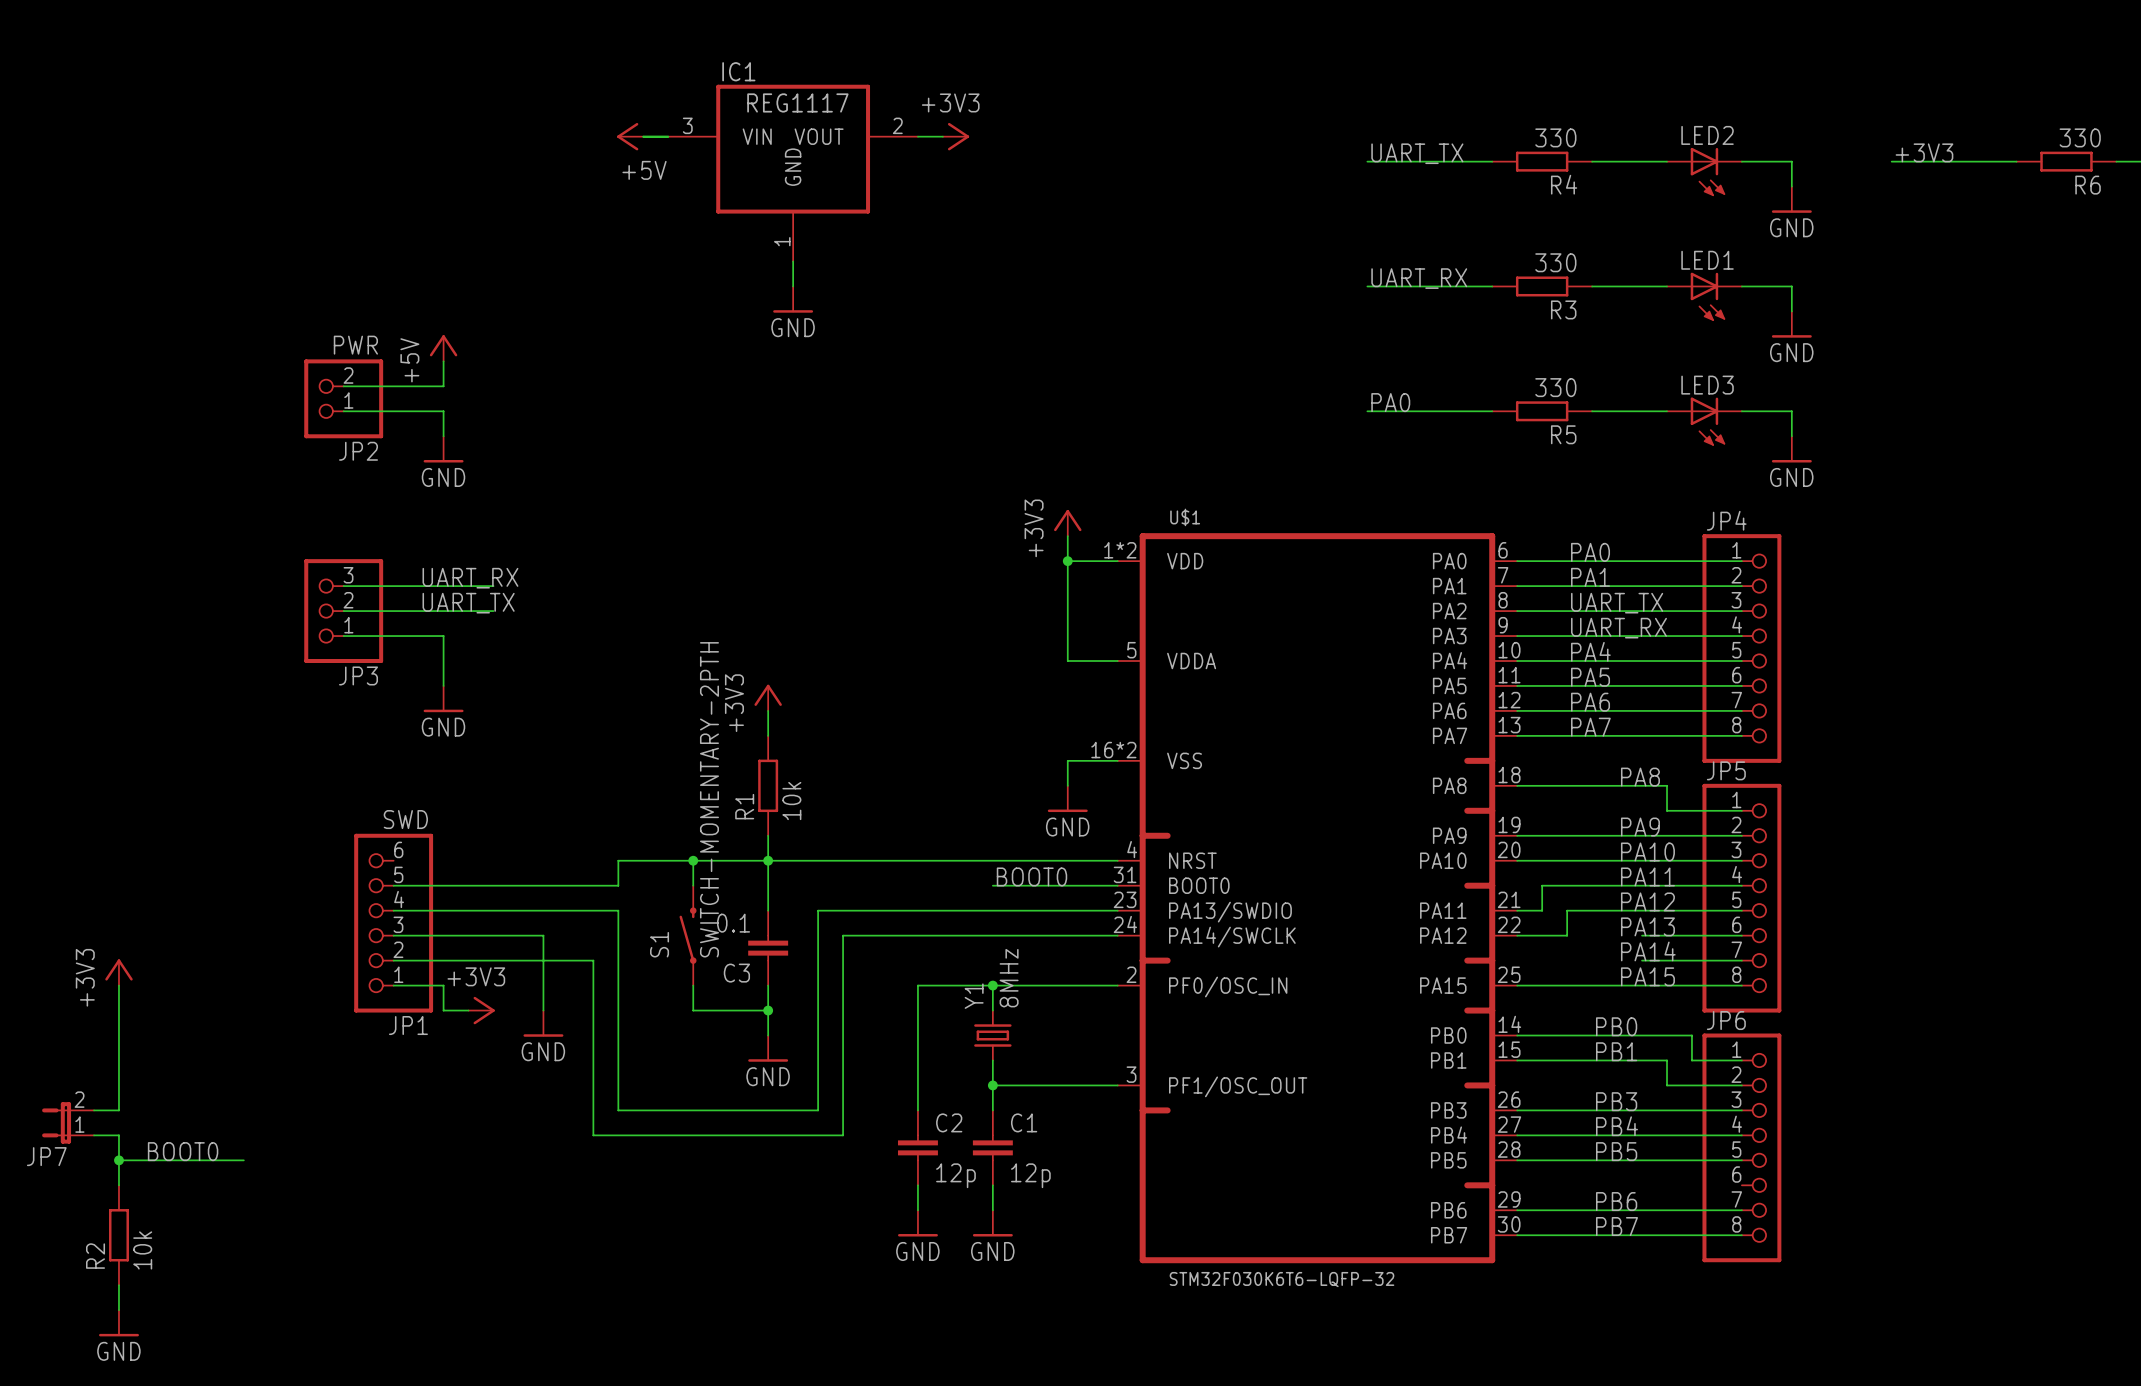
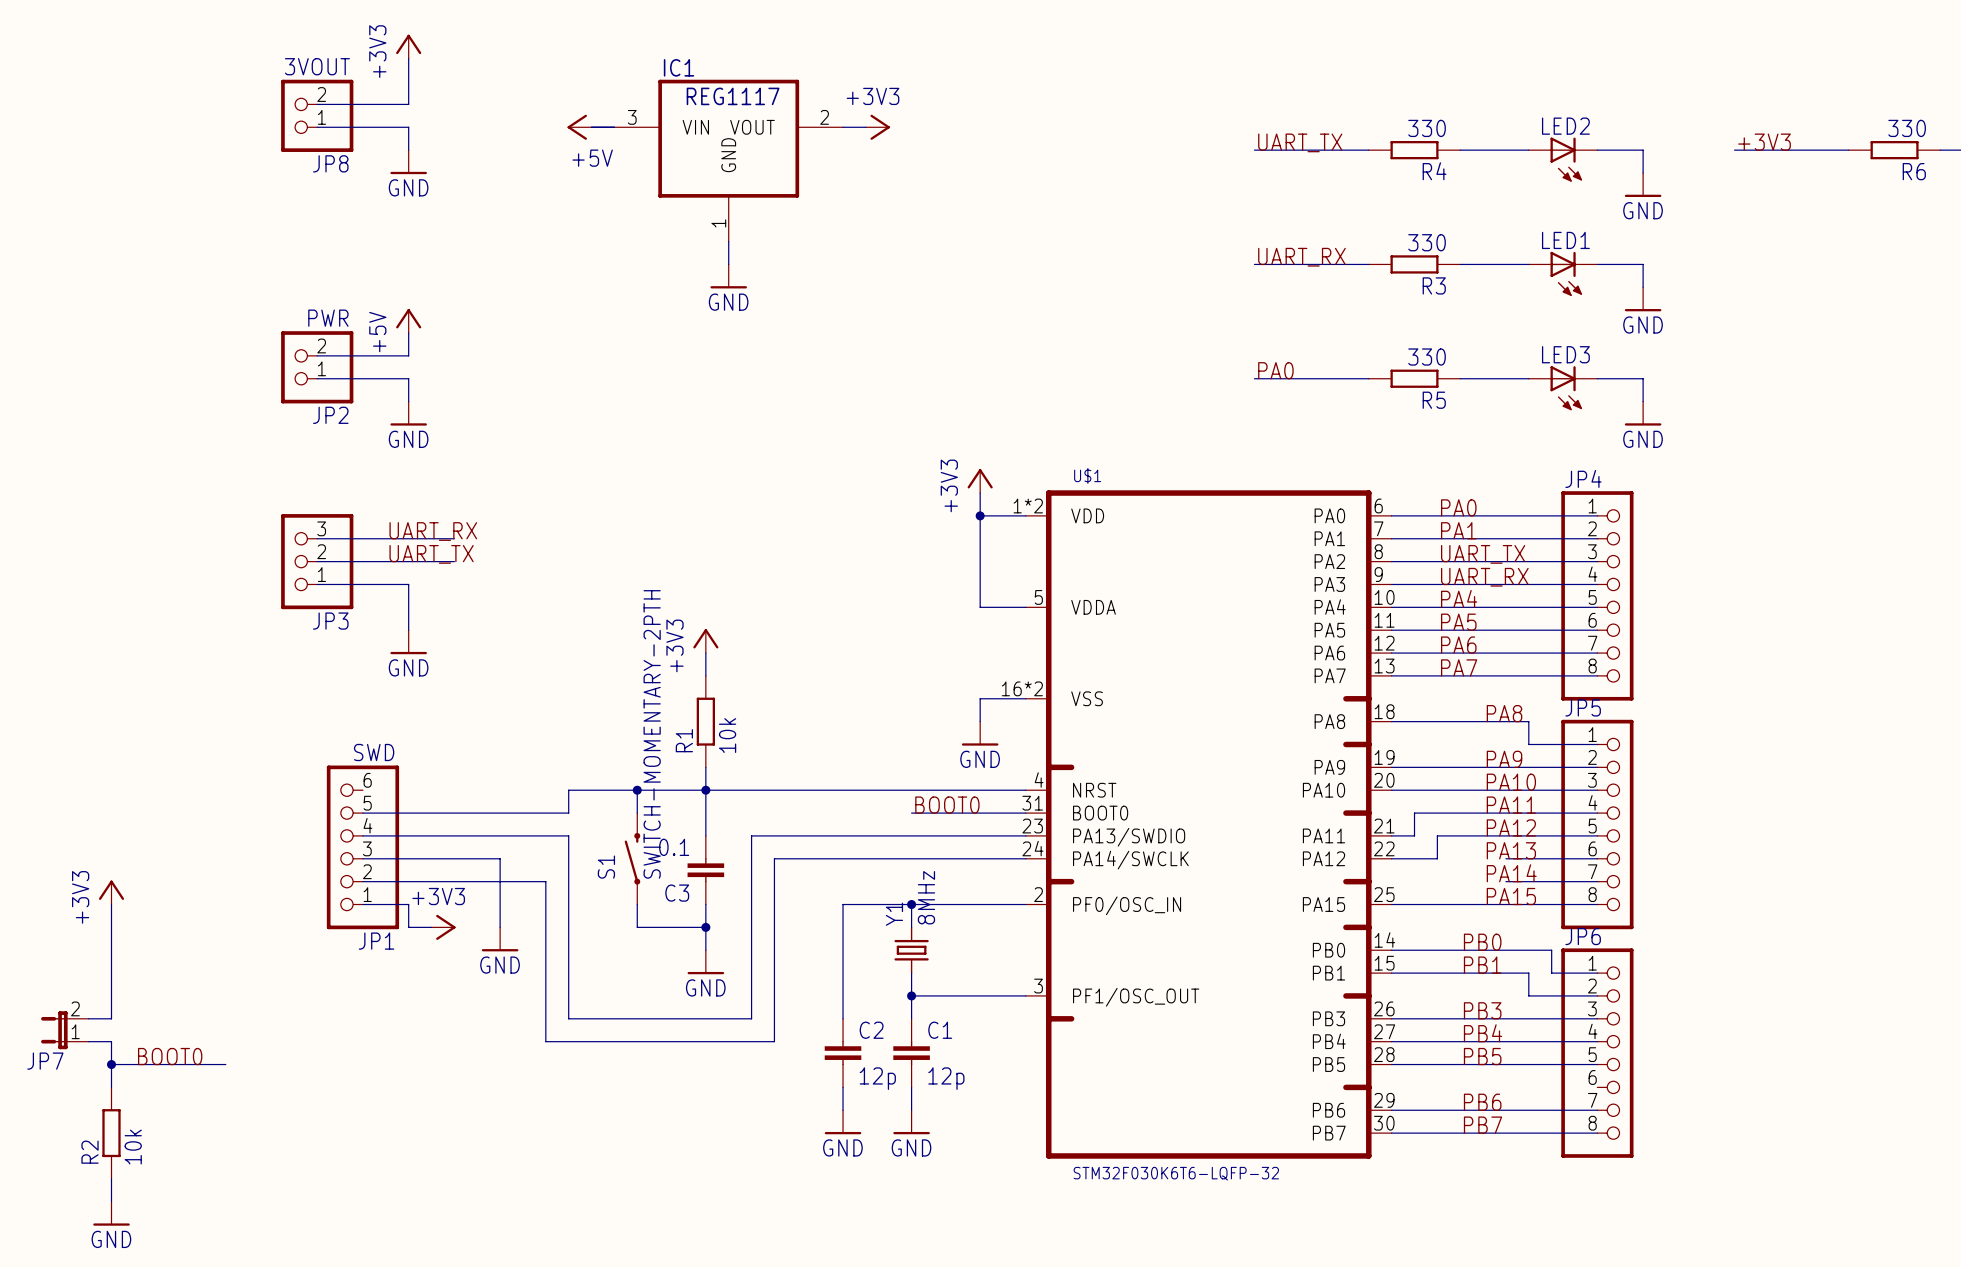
power symbol: none -> +3V3 (408, 46)
wire: none -> (408, 58) (408, 104) (317, 104)
JP8: none -> 3VOUT (317, 115)
wire: none -> (317, 127) (408, 127) (408, 150)
power symbol: none -> GND (408, 162)

